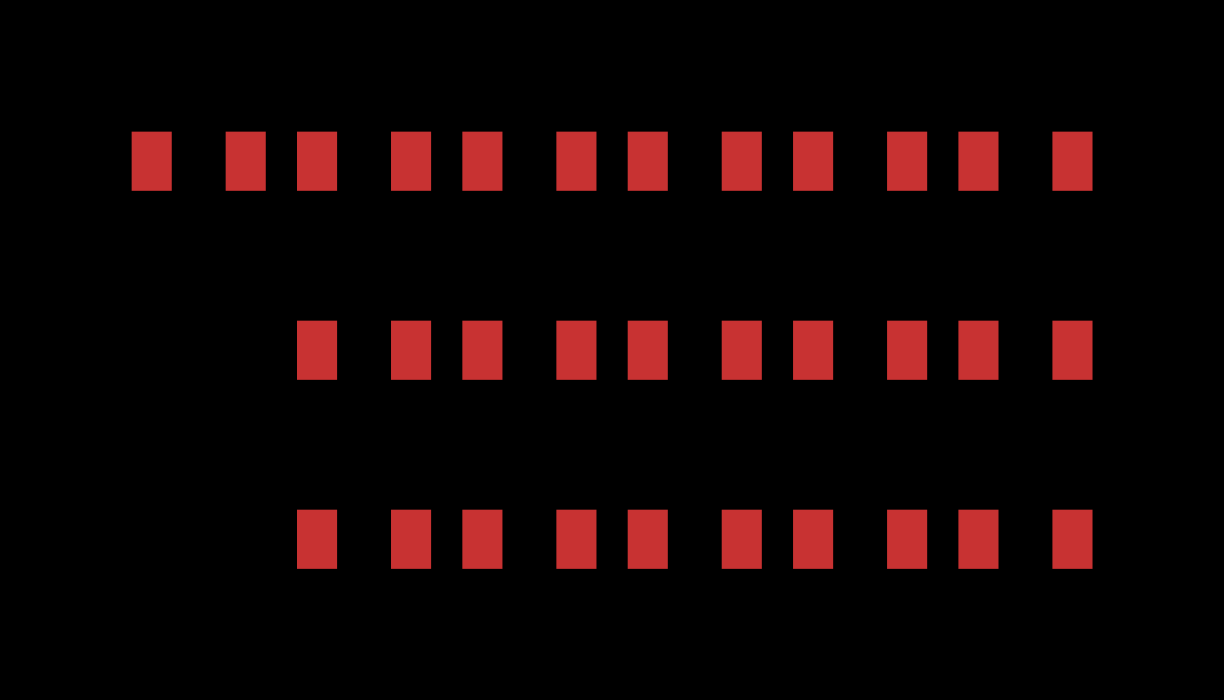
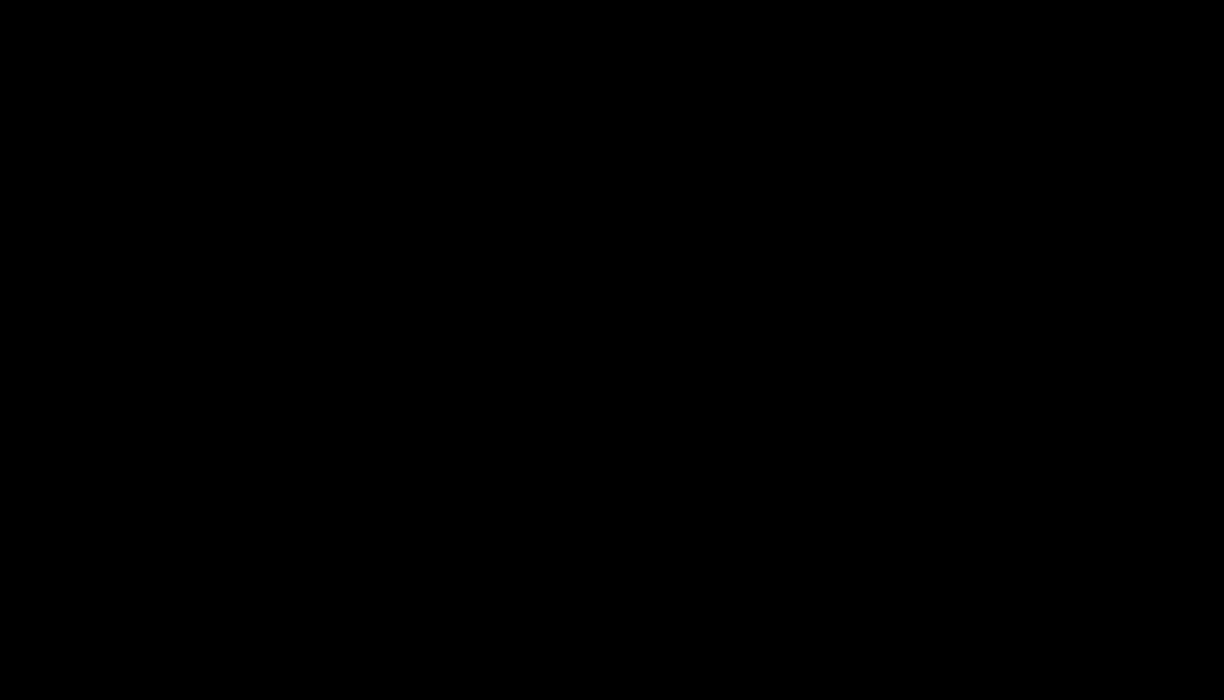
part: (198, 161) -> none
part: (364, 161) -> none
part: (529, 161) -> none
part: (694, 161) -> none
part: (860, 161) -> none
part: (1025, 161) -> none
part: (364, 350) -> none
part: (529, 350) -> none
part: (694, 350) -> none
part: (860, 350) -> none
part: (1025, 350) -> none
part: (364, 539) -> none
part: (529, 539) -> none
part: (694, 539) -> none
part: (860, 539) -> none
part: (1025, 539) -> none

